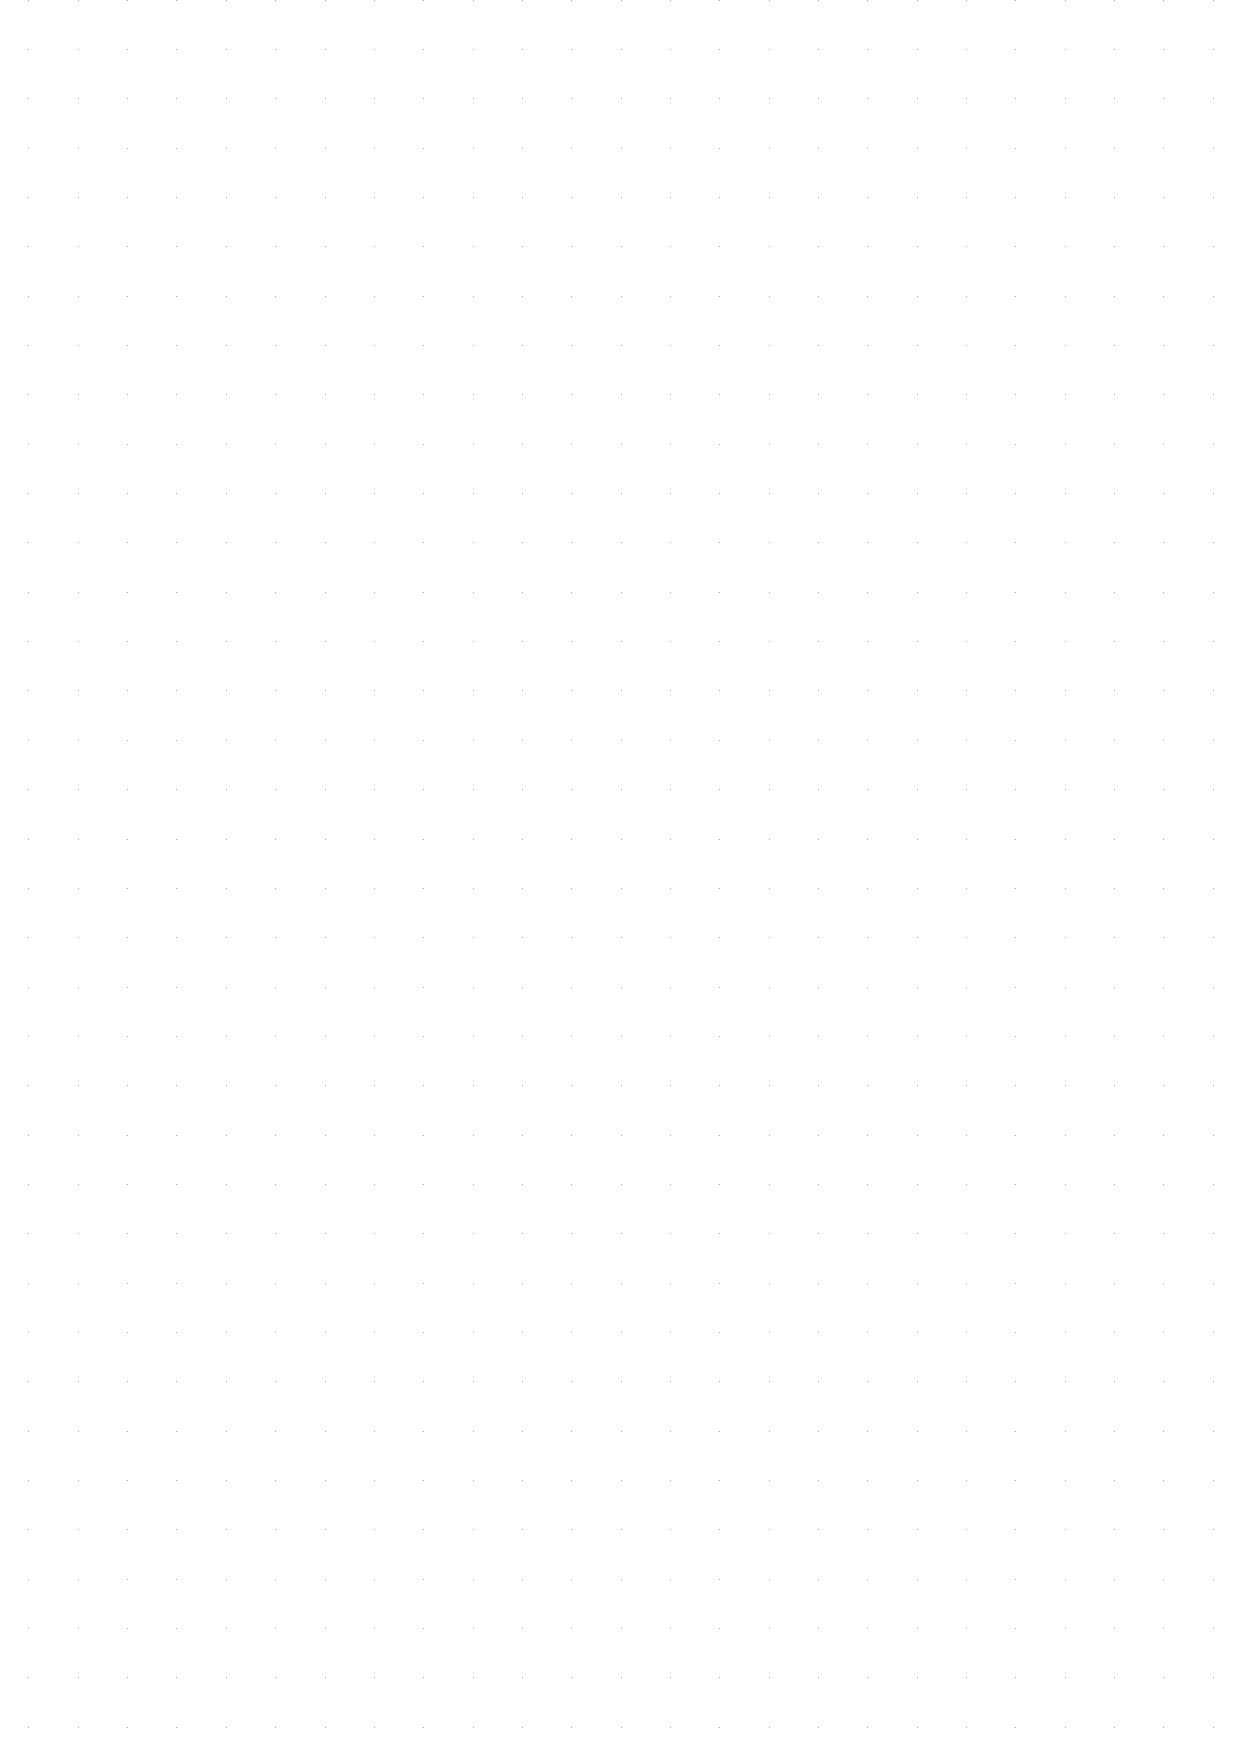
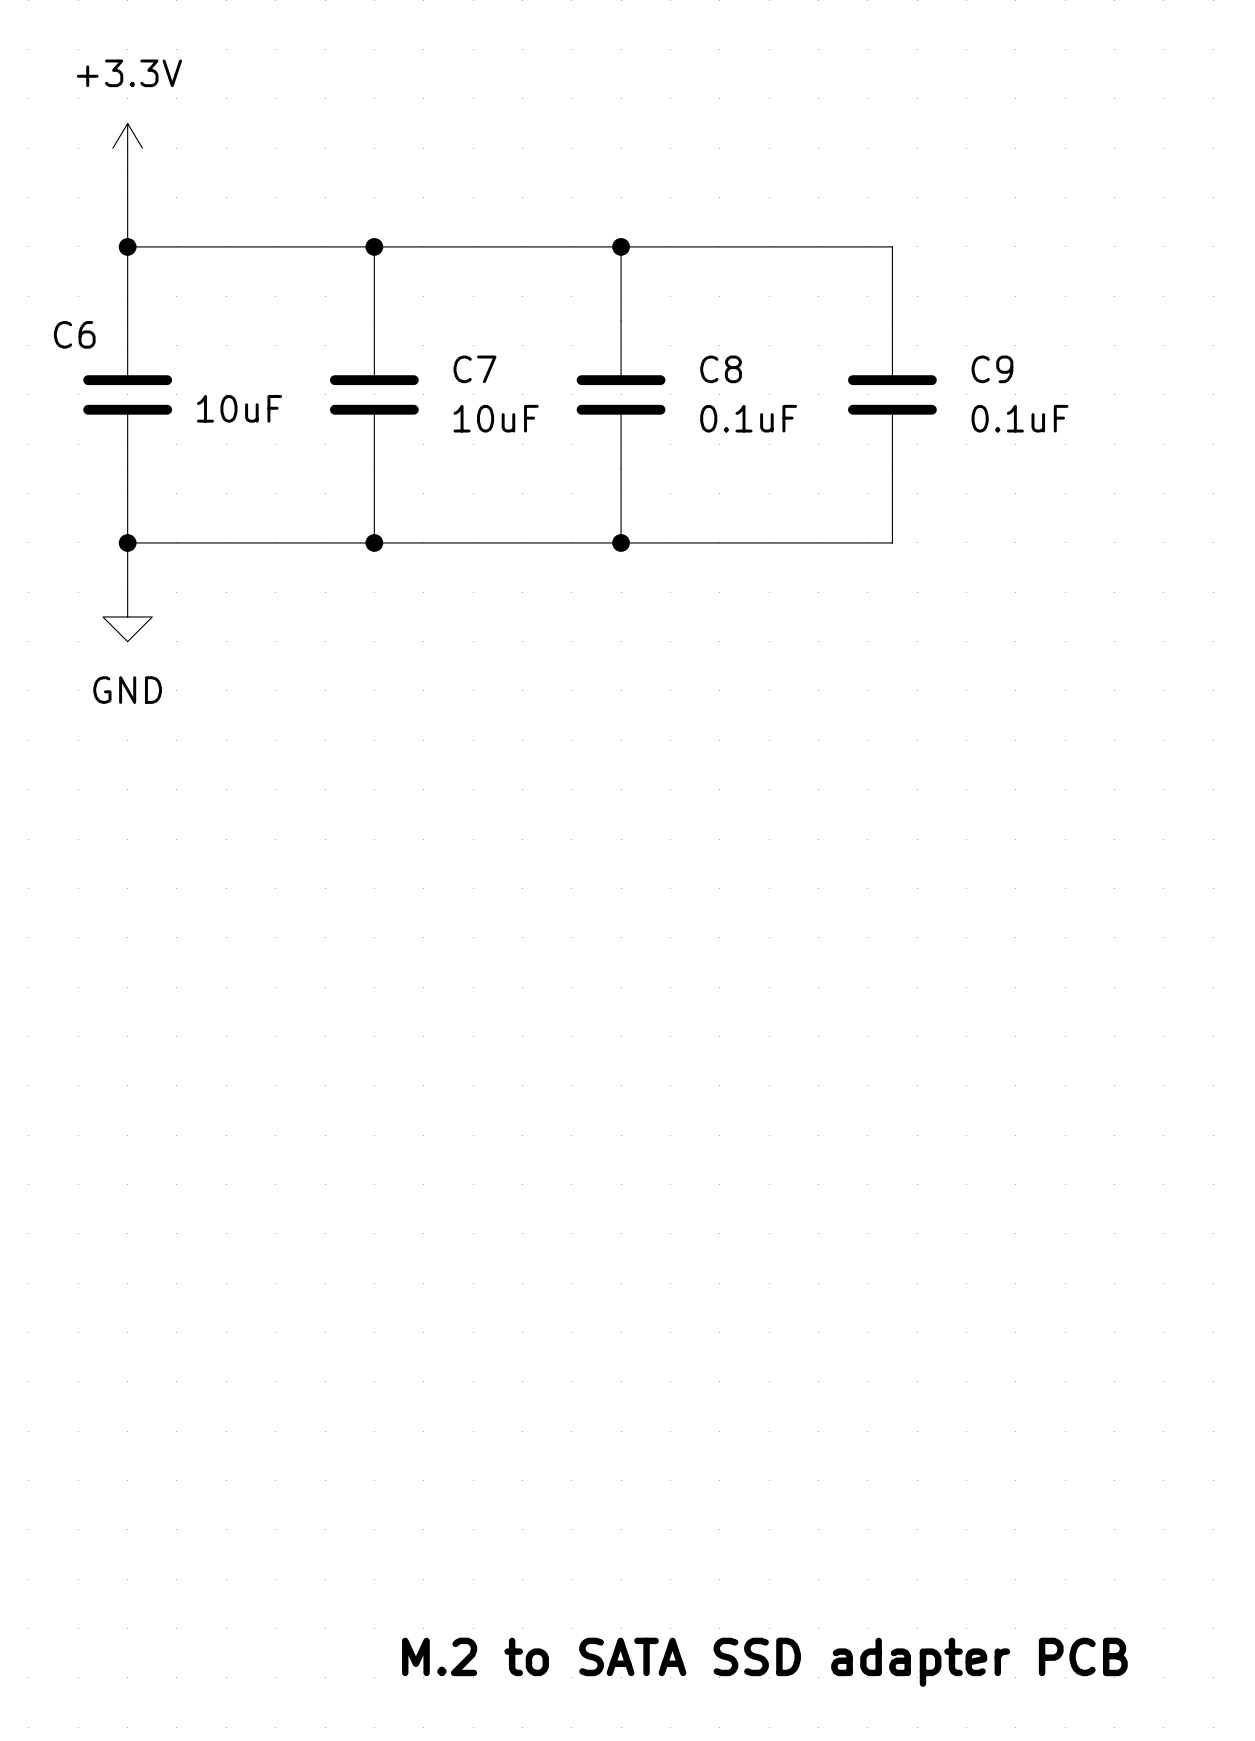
power symbol: none -> +3.3V (127, 148)
wire: none -> (127, 172) (127, 320)
wire: none -> (127, 246) (892, 246) (892, 320)
junction: none -> (127, 246)
wire: none -> (374, 246) (374, 320)
junction: none -> (374, 246)
wire: none -> (621, 246) (621, 320)
junction: none -> (621, 246)
C6: none -> 10uF (127, 394)
C7: none -> 10uF (374, 394)
C8: none -> 0.1uF (621, 394)
C9: none -> 0.1uF (892, 394)
wire: none -> (127, 468) (127, 592)
wire: none -> (374, 468) (374, 542)
wire: none -> (621, 468) (621, 542)
wire: none -> (892, 468) (892, 542) (127, 542)
junction: none -> (127, 542)
junction: none -> (374, 542)
junction: none -> (621, 542)
power symbol: none -> GND (127, 616)
text: none -> M.2 to SATA SSD adapter PCB (764, 1662)

